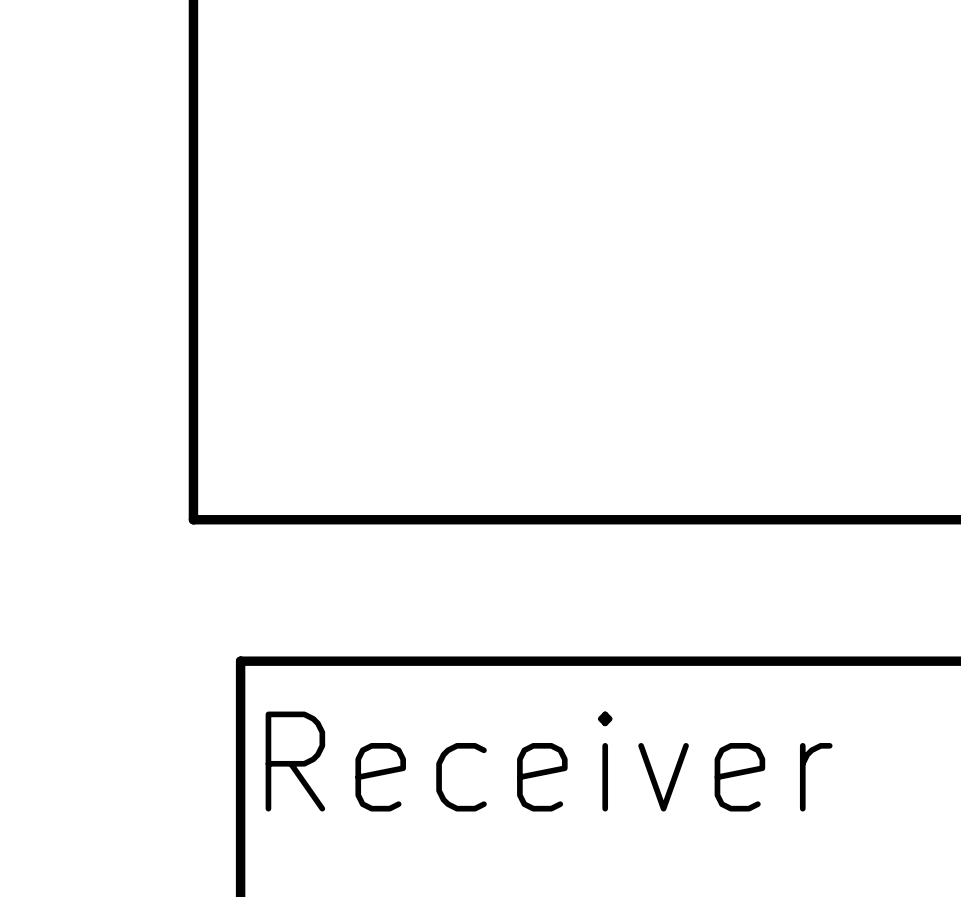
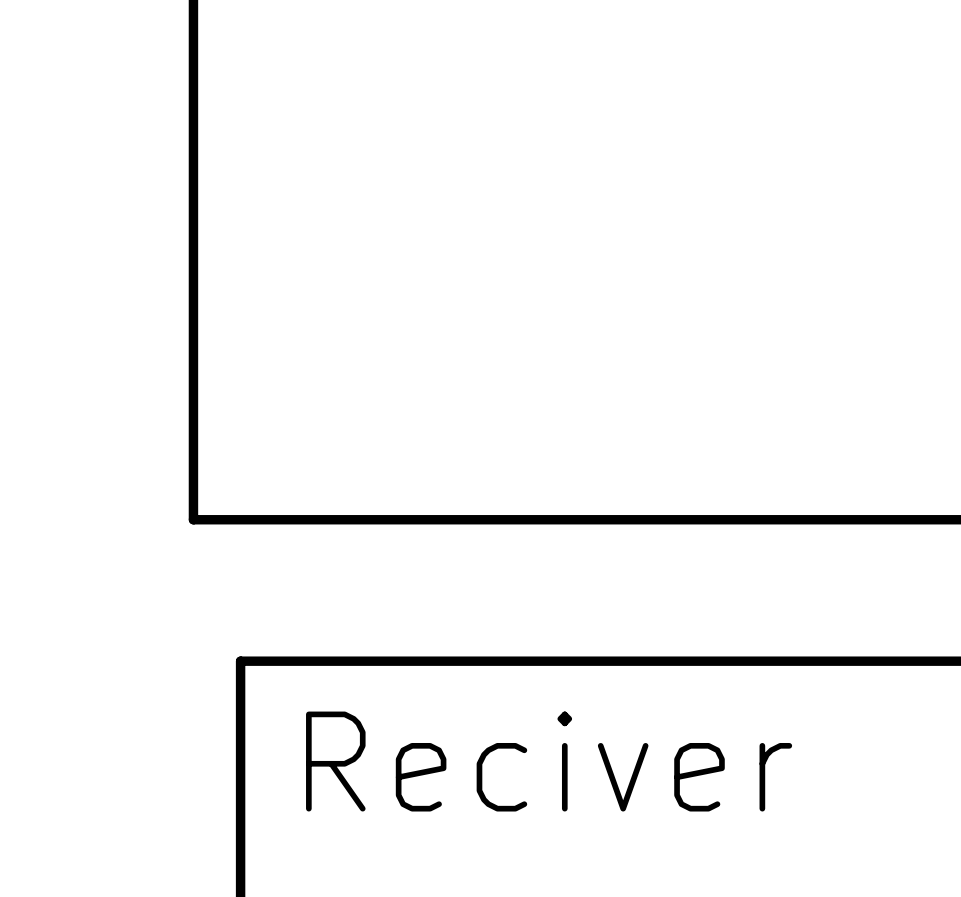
text: Receiver (549, 761) -> Reciver (549, 761)

